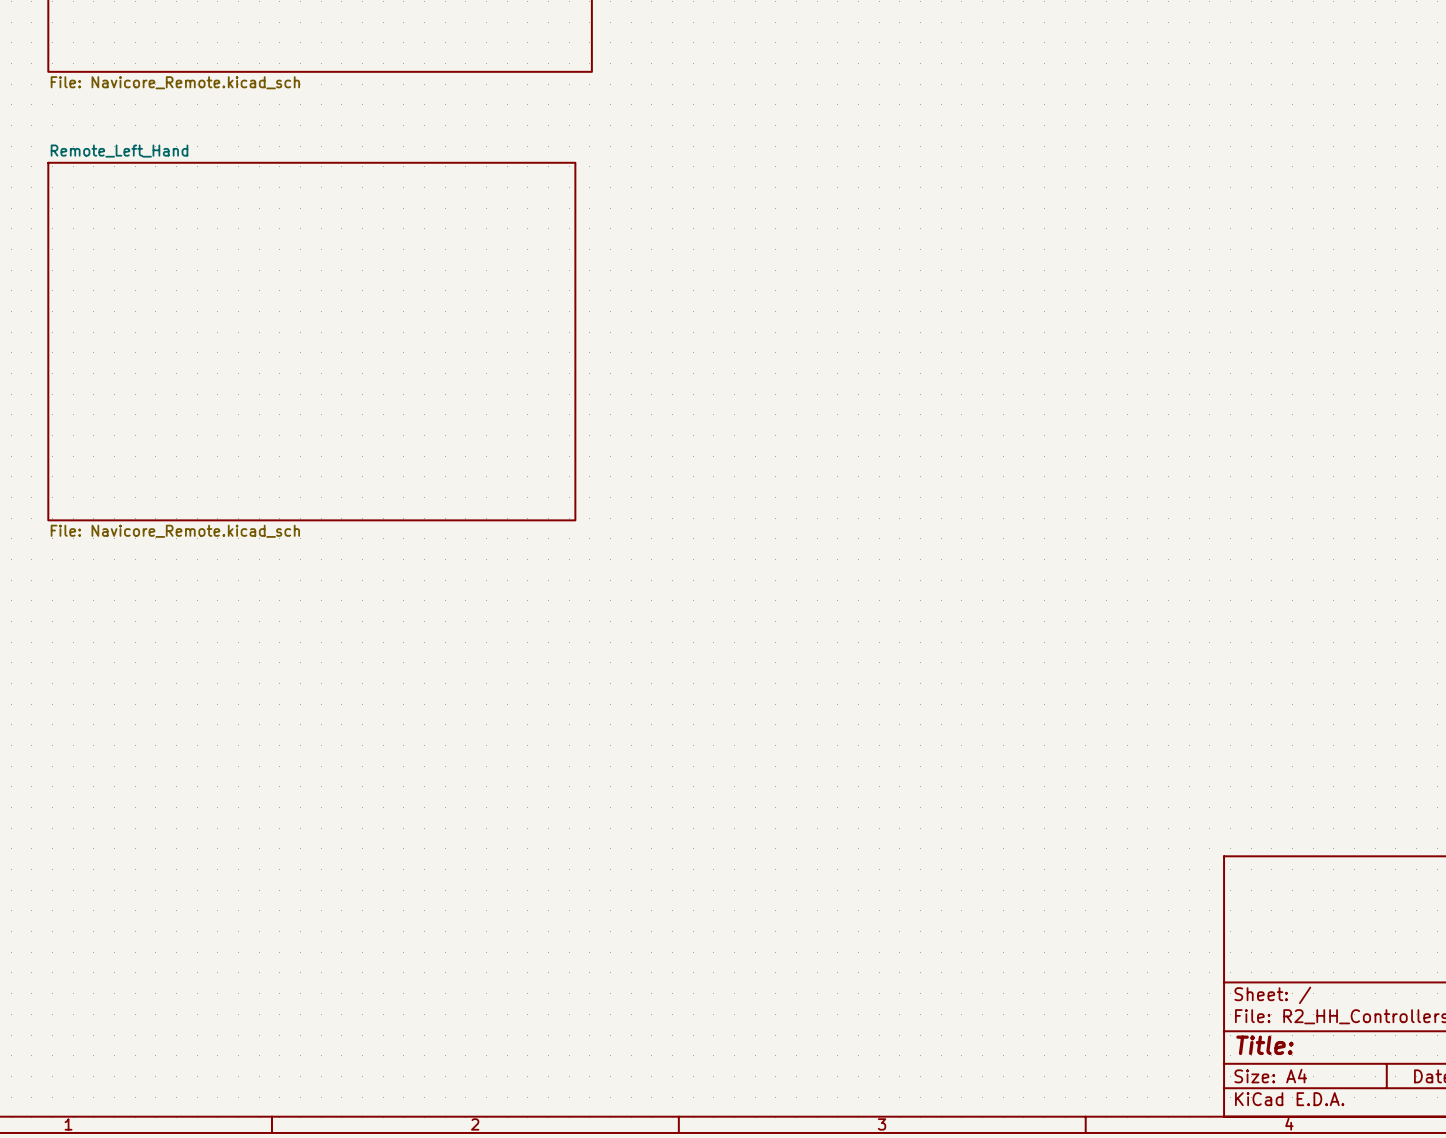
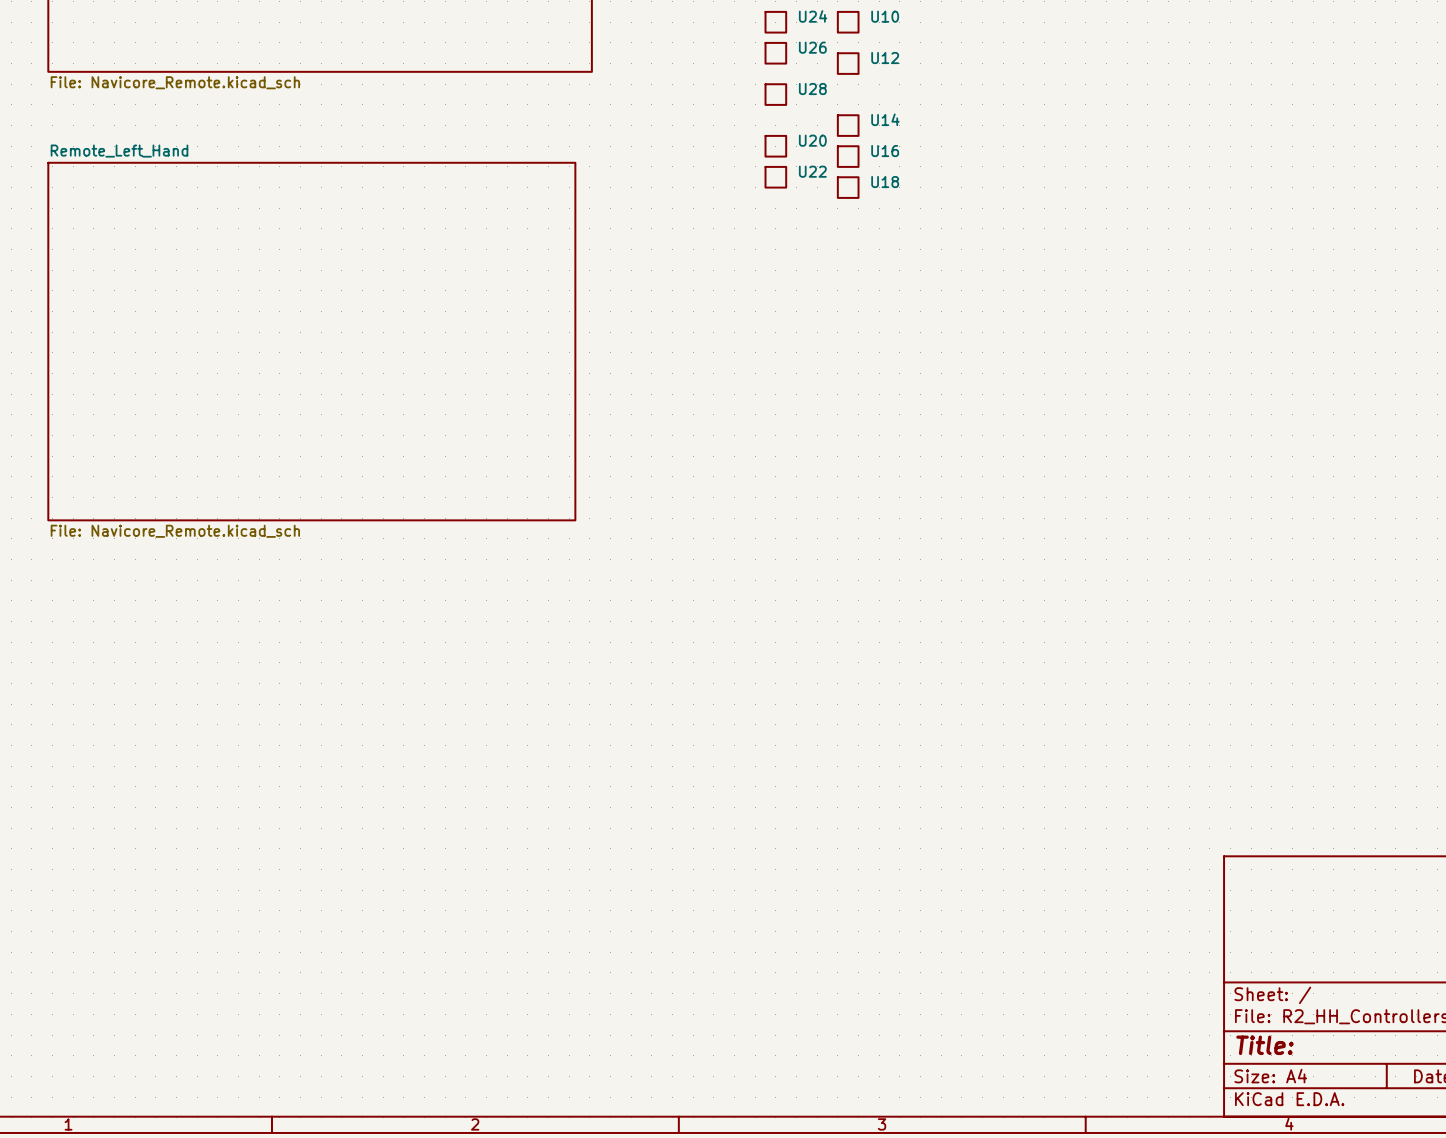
U24: none -> (775, 22)
U10: none -> (848, 22)
U26: none -> (775, 53)
U12: none -> (848, 63)
U28: none -> (775, 94)
U14: none -> (848, 125)
U20: none -> (775, 146)
U16: none -> (848, 156)
U22: none -> (775, 177)
U18: none -> (848, 187)

